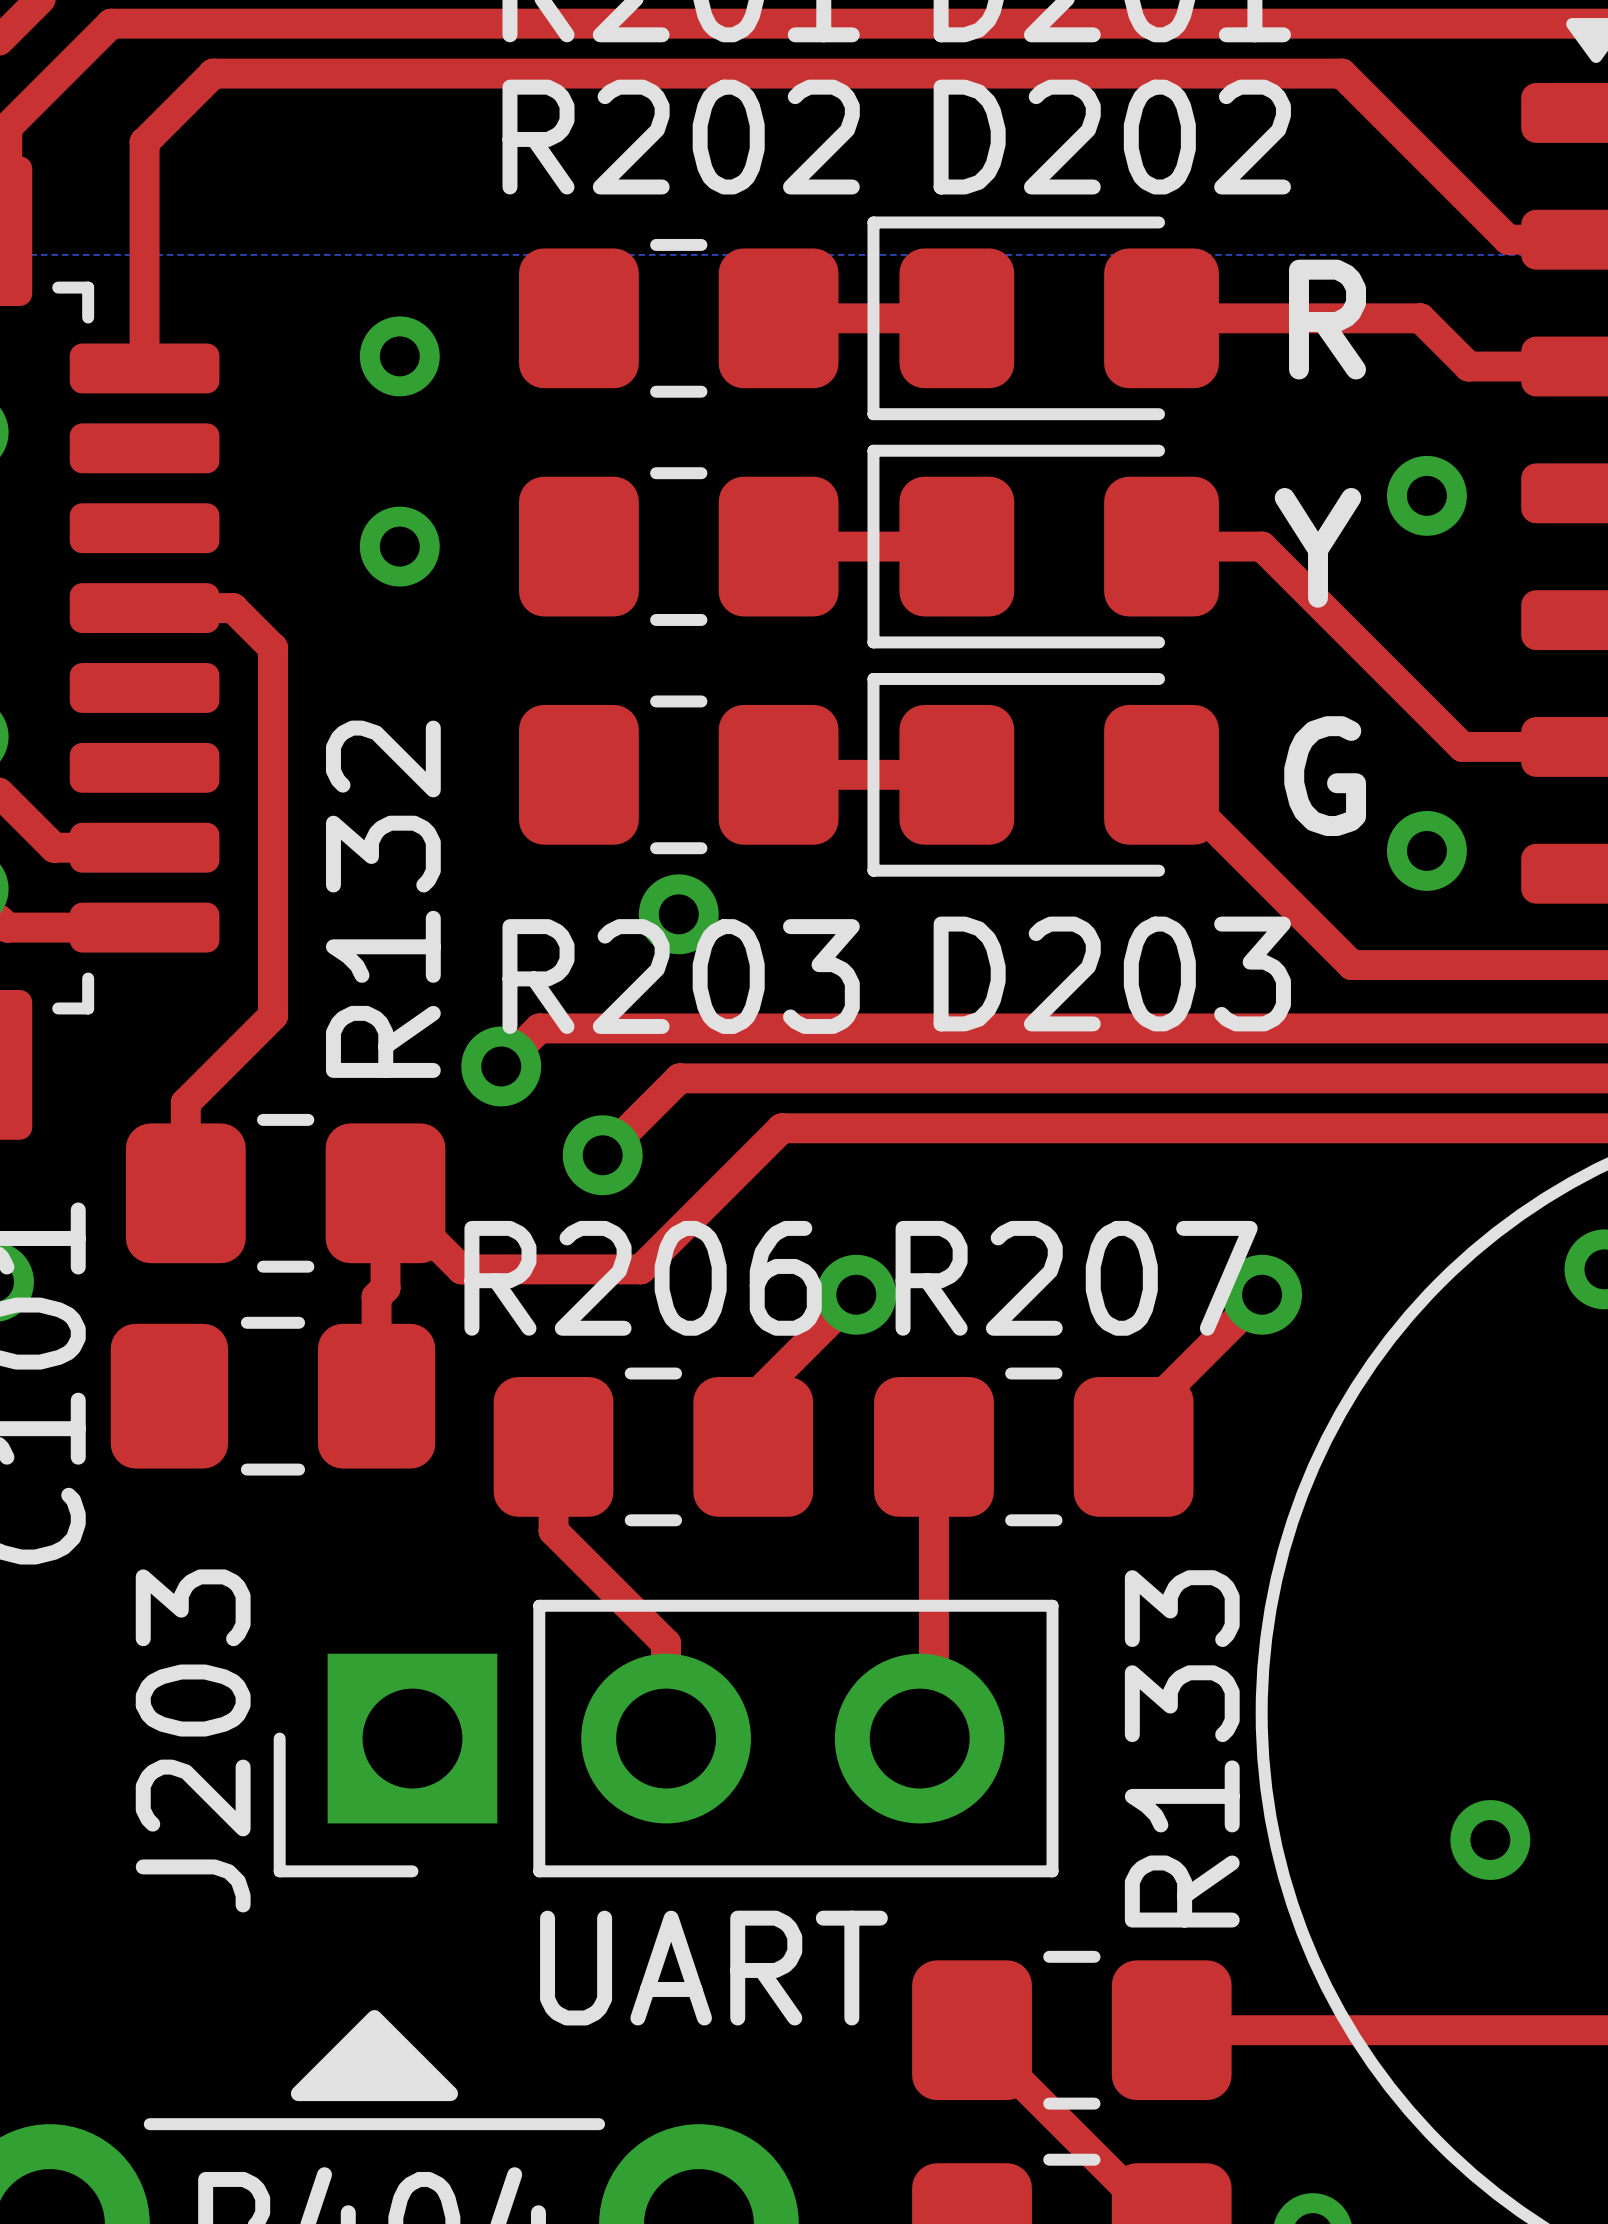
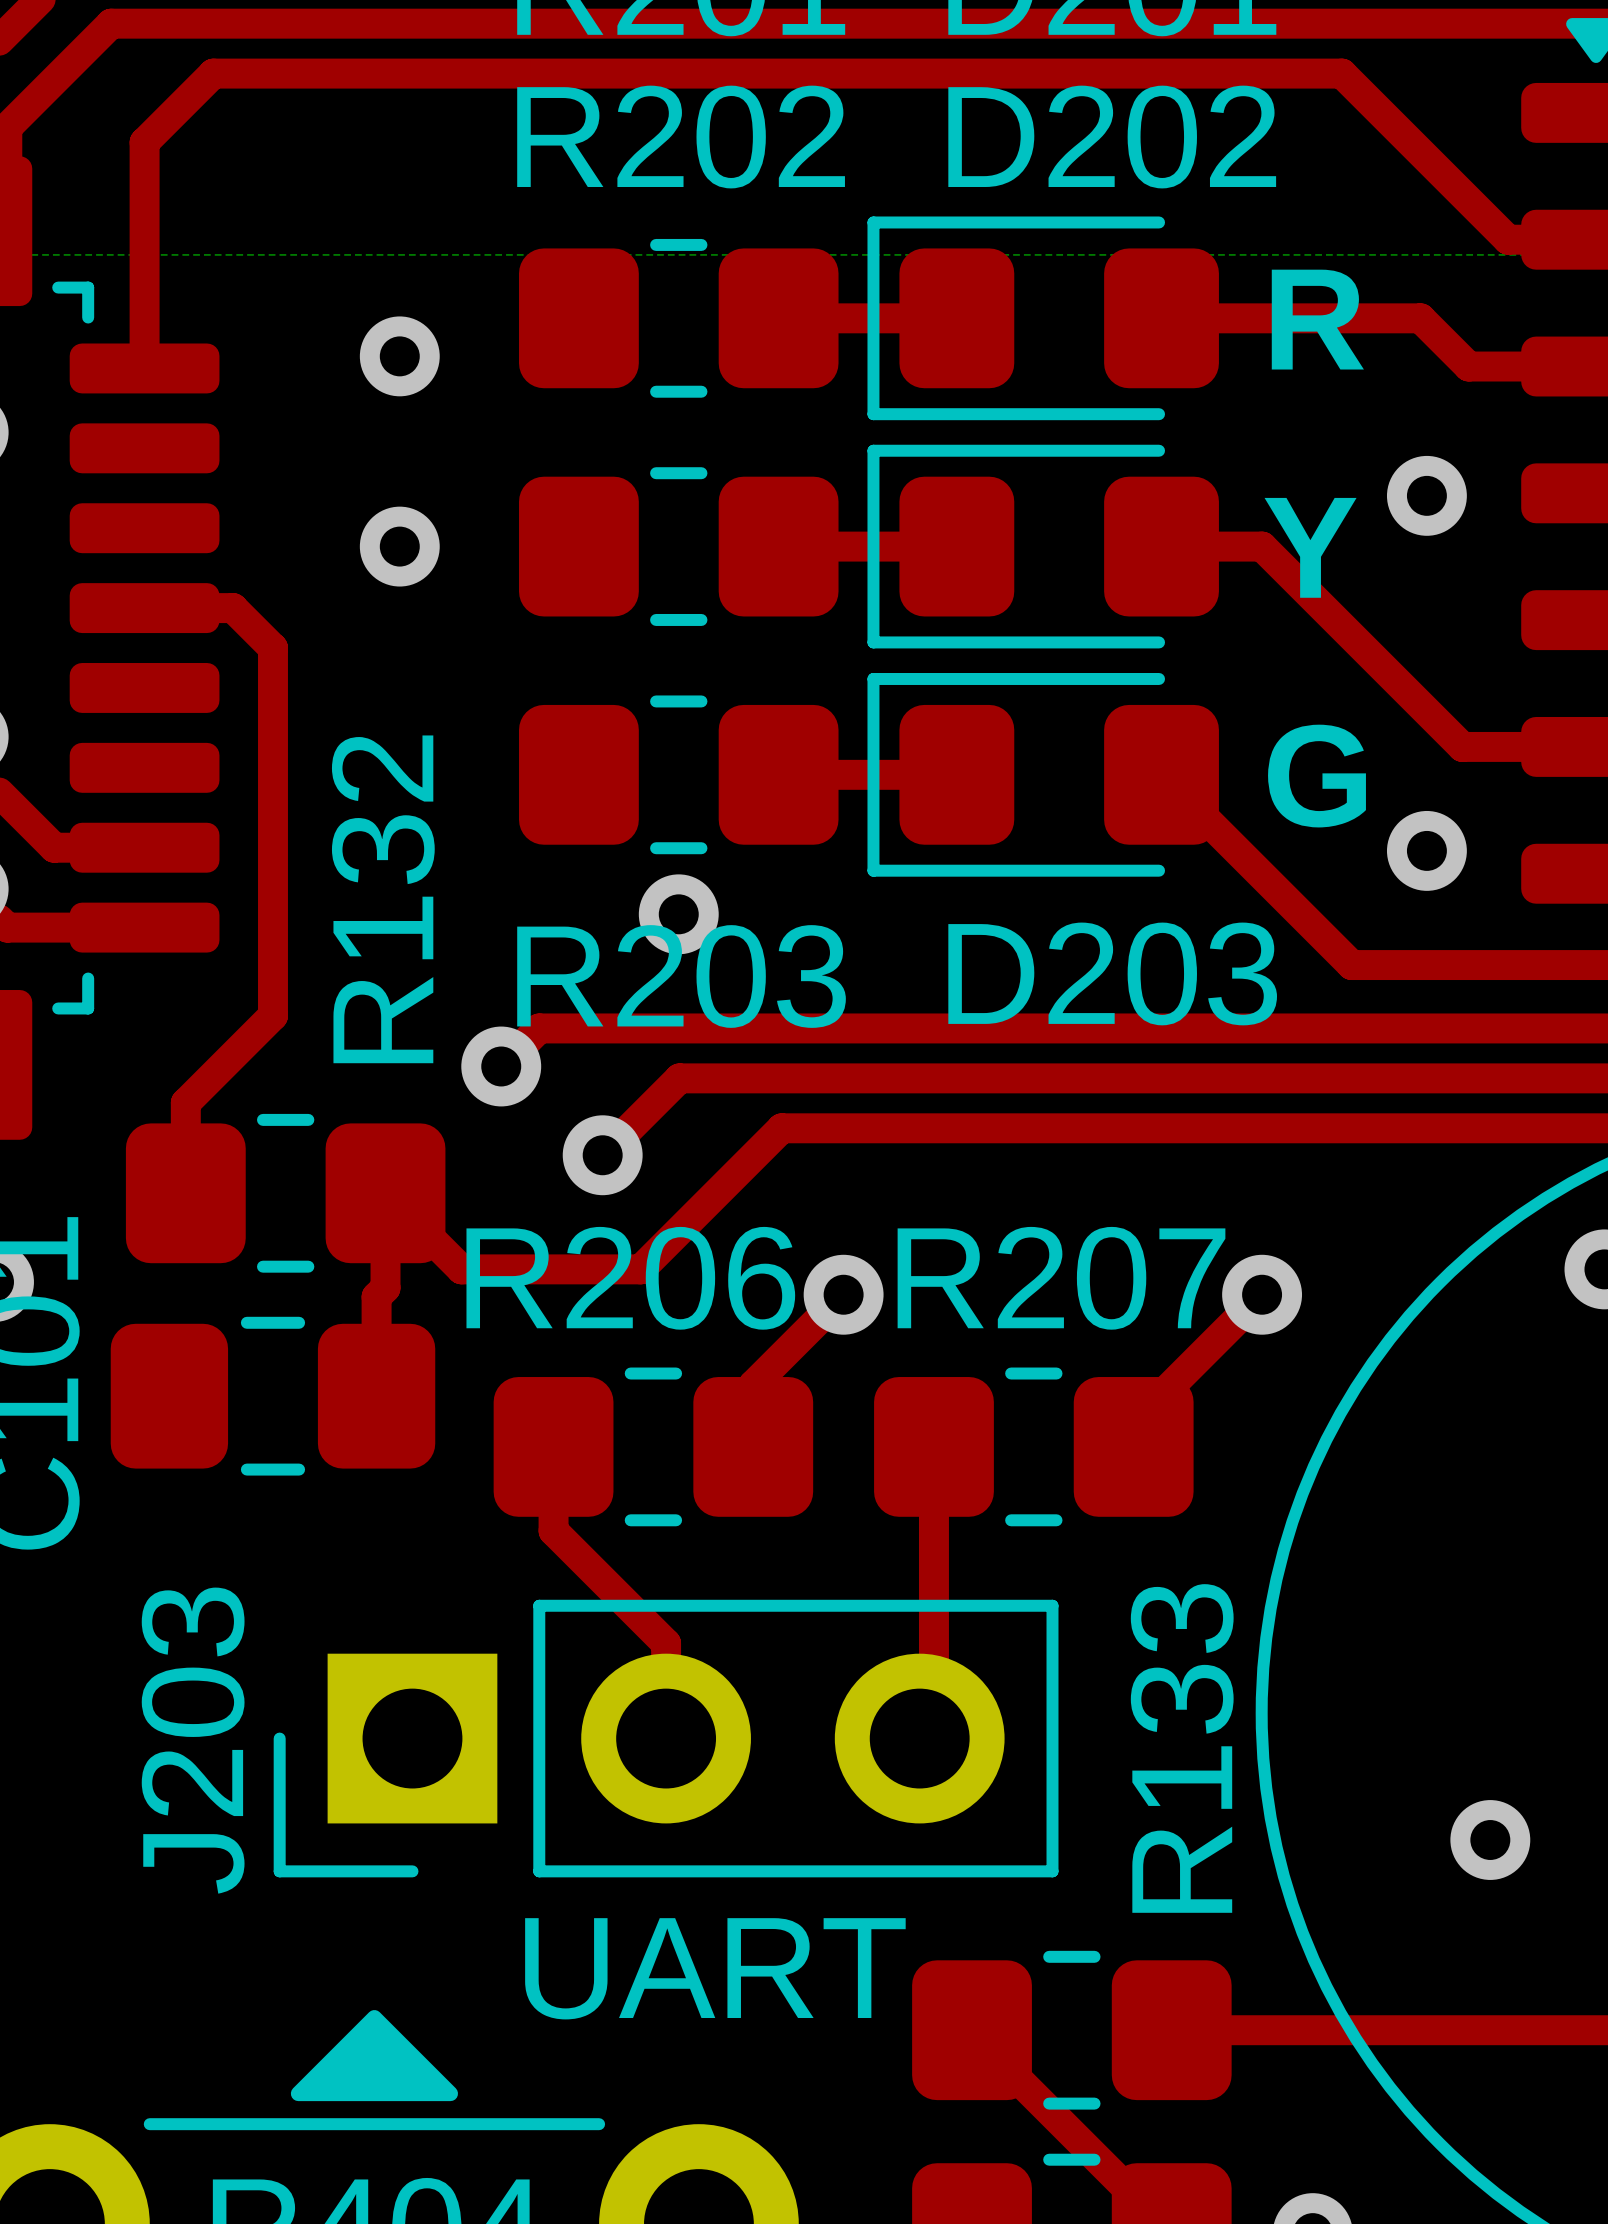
R206 name position: R206 (643, 1278) -> R206 (630, 1278)
R207 name position: R207 (1076, 1278) -> R207 (1061, 1278)
top track: (856, 1294) (753, 1397) -> (843, 1294) (753, 1385) (753, 1397)
via position: (856, 1294) -> (843, 1294)

